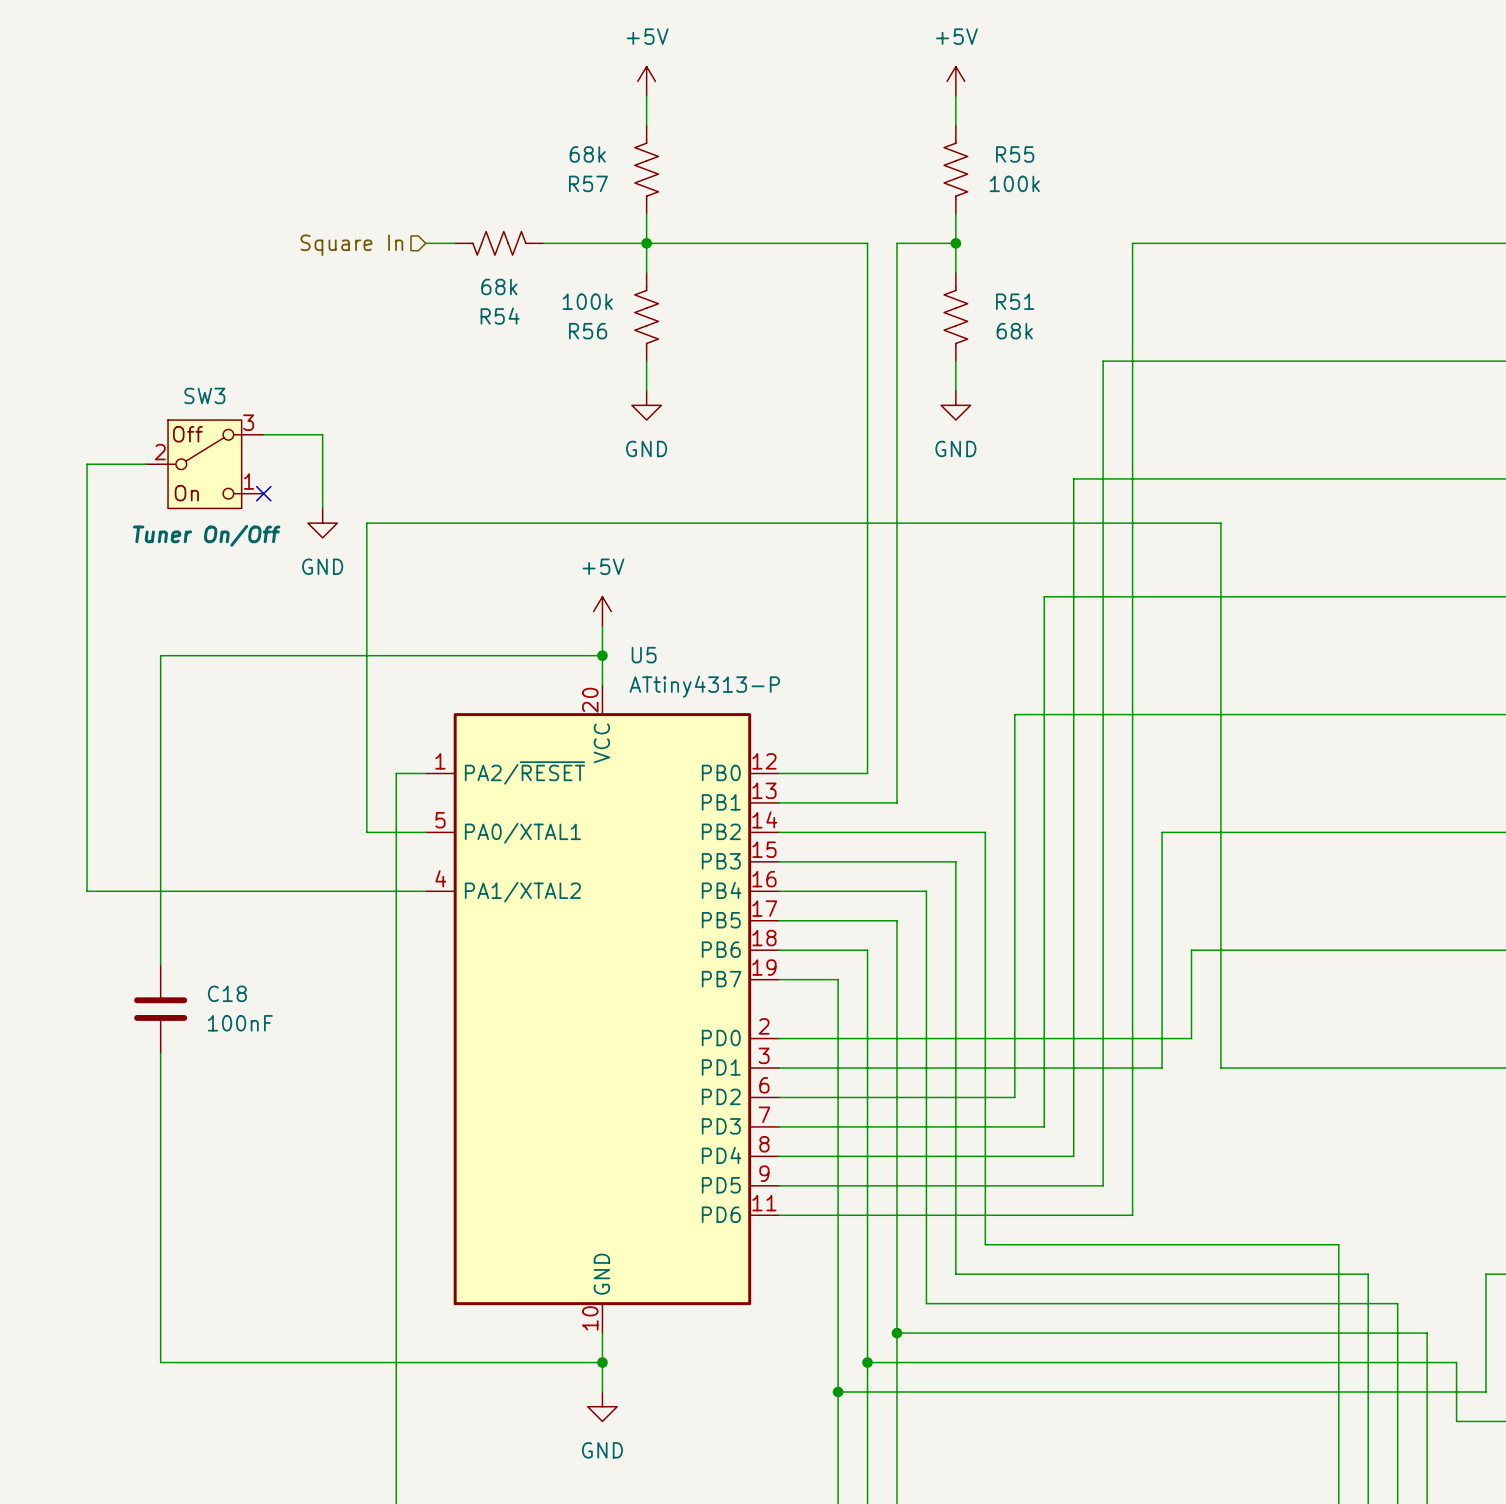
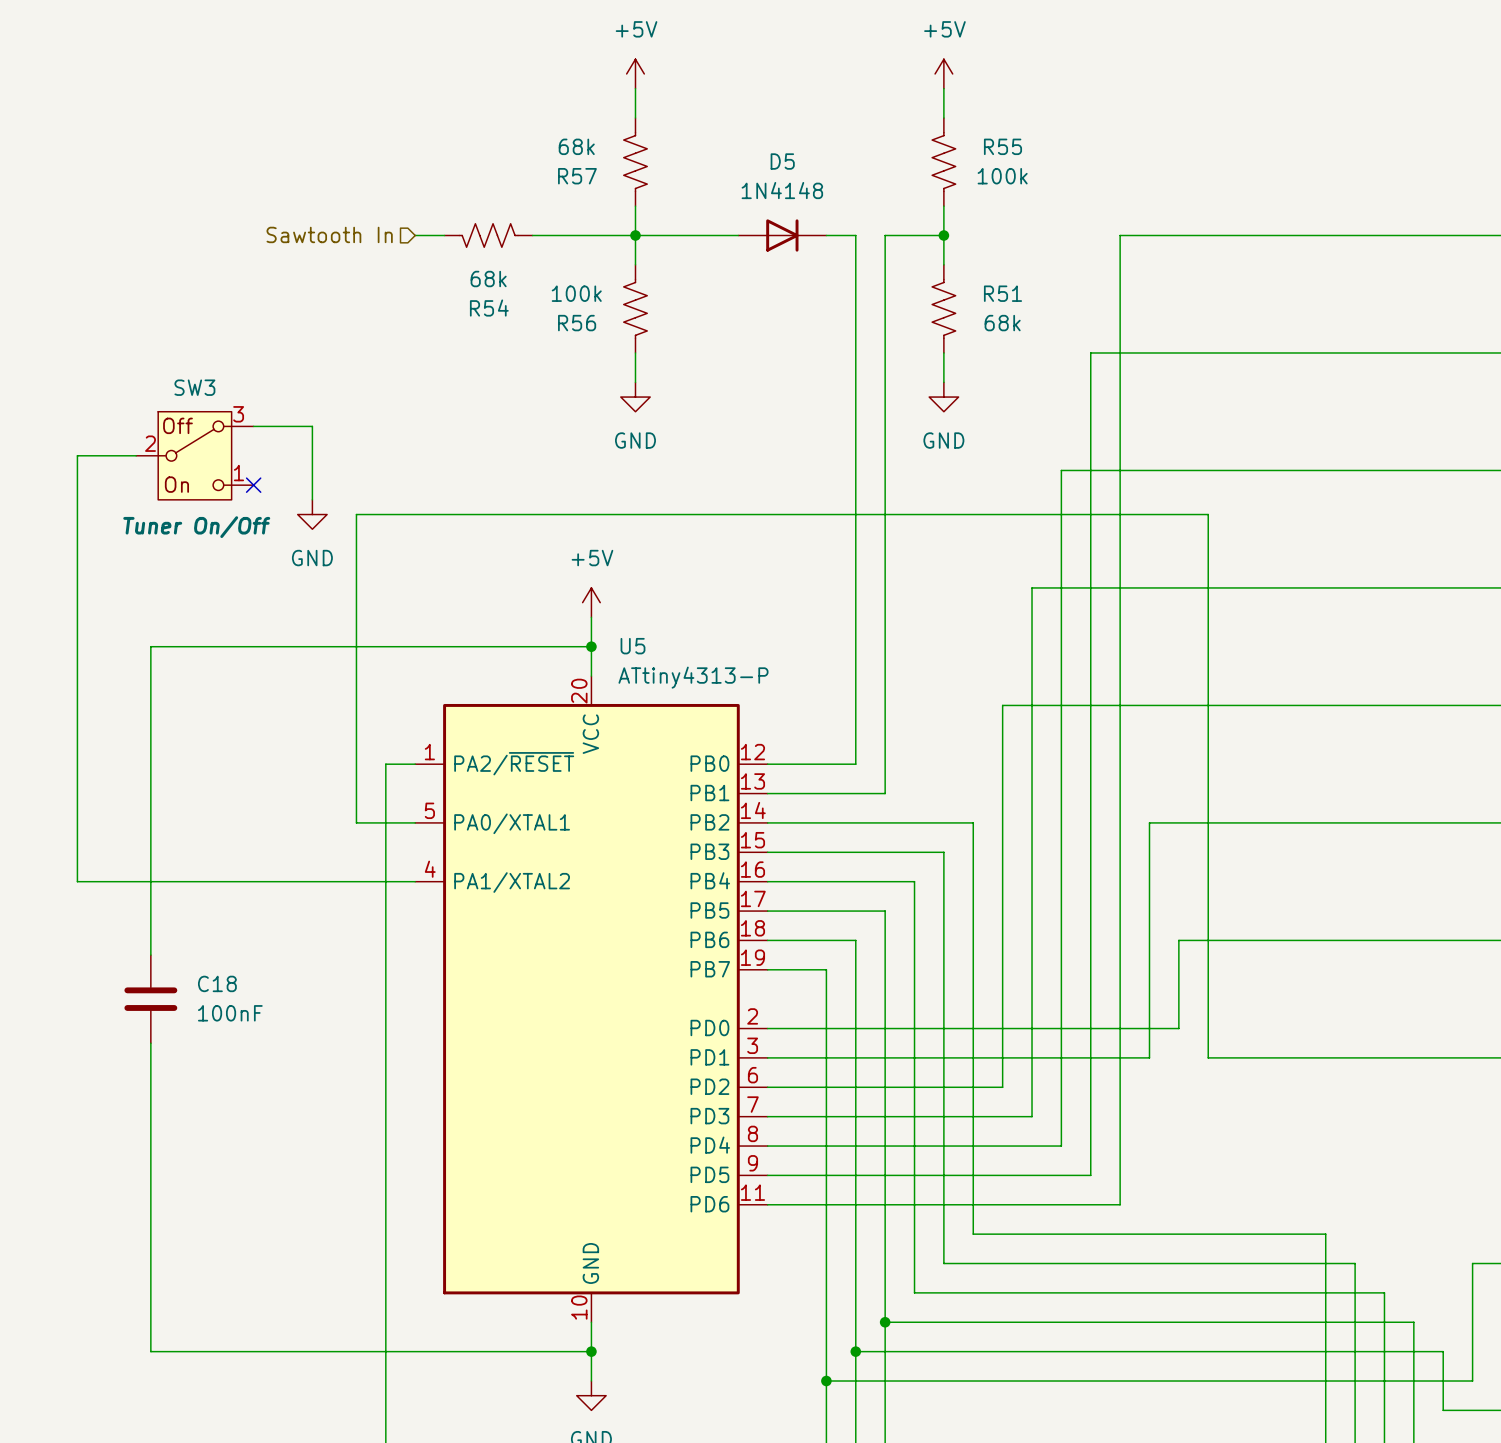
D5: none -> 1N4148 (782, 235)
hierarchical label: Square In (351, 245) -> Sawtooth In (329, 234)

